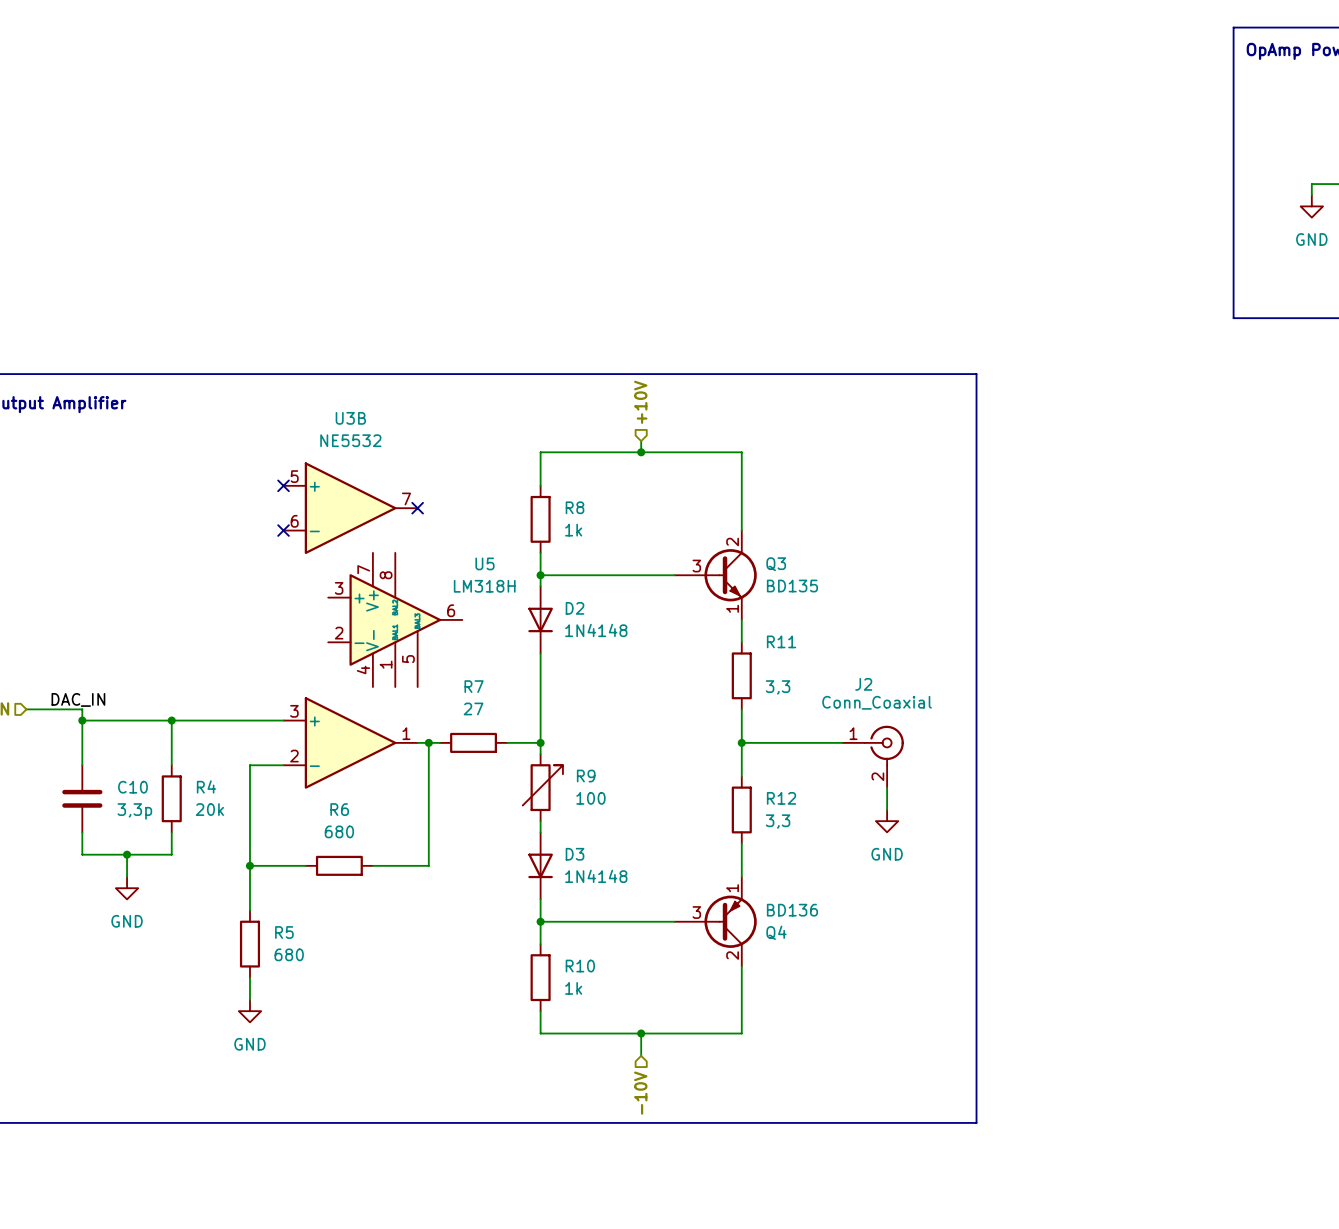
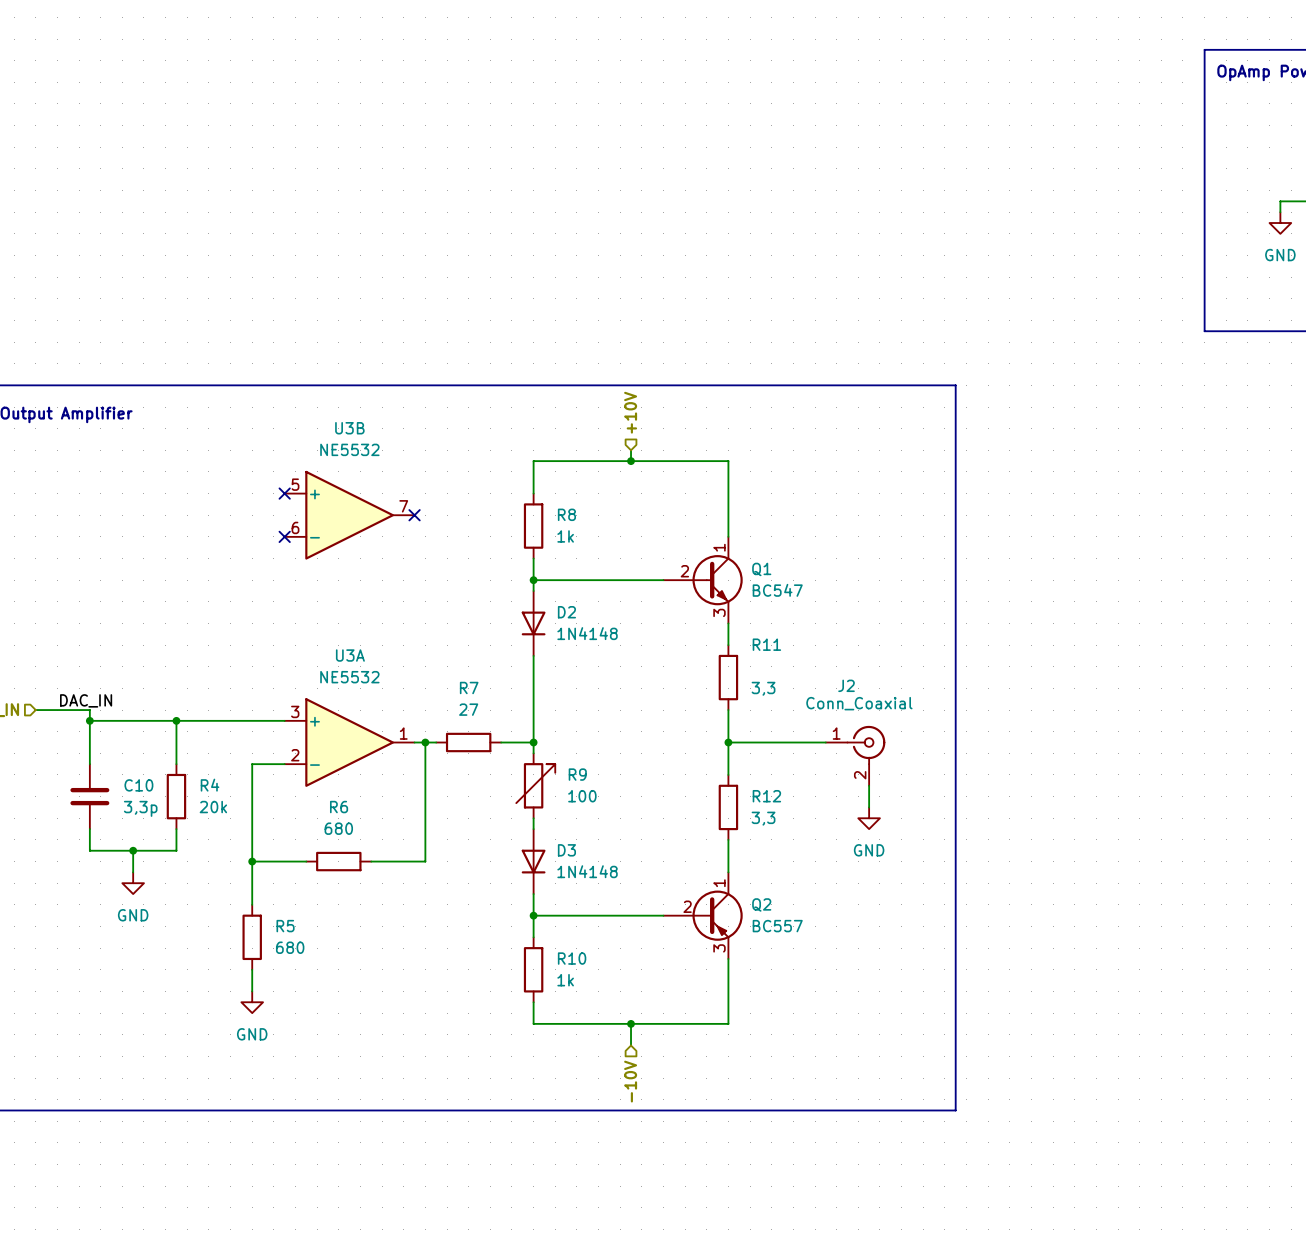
Q3: BD135 (715, 575) -> none
Q1: none -> BC547 (703, 580)
U5: LM318H (395, 619) -> none
U3A name: none -> U3A (350, 655)
U3A value: none -> NE5532 (349, 677)
Q4: BD136 (715, 921) -> none
Q2: none -> BC557 (703, 915)

